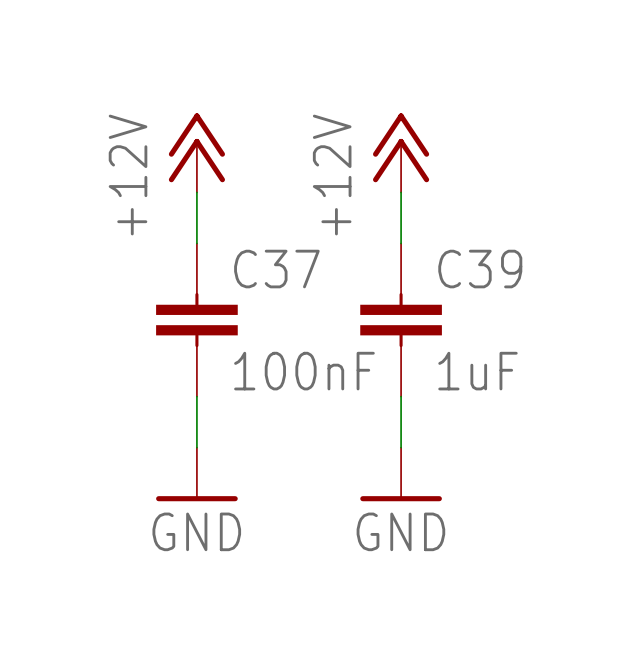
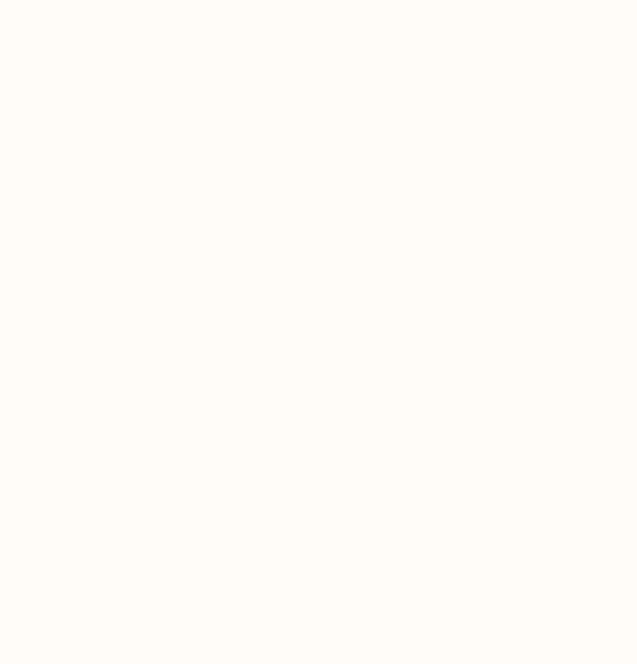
power symbol: +12V (196, 152) -> none
power symbol: +12V (401, 152) -> none
wire: (196, 192) (196, 243) -> none
wire: (401, 192) (401, 243) -> none
C37: 100nF (196, 320) -> none
C39: 1uF (401, 320) -> none
wire: (196, 396) (196, 447) -> none
wire: (401, 396) (401, 447) -> none
power symbol: GND (196, 474) -> none
power symbol: GND (401, 474) -> none

